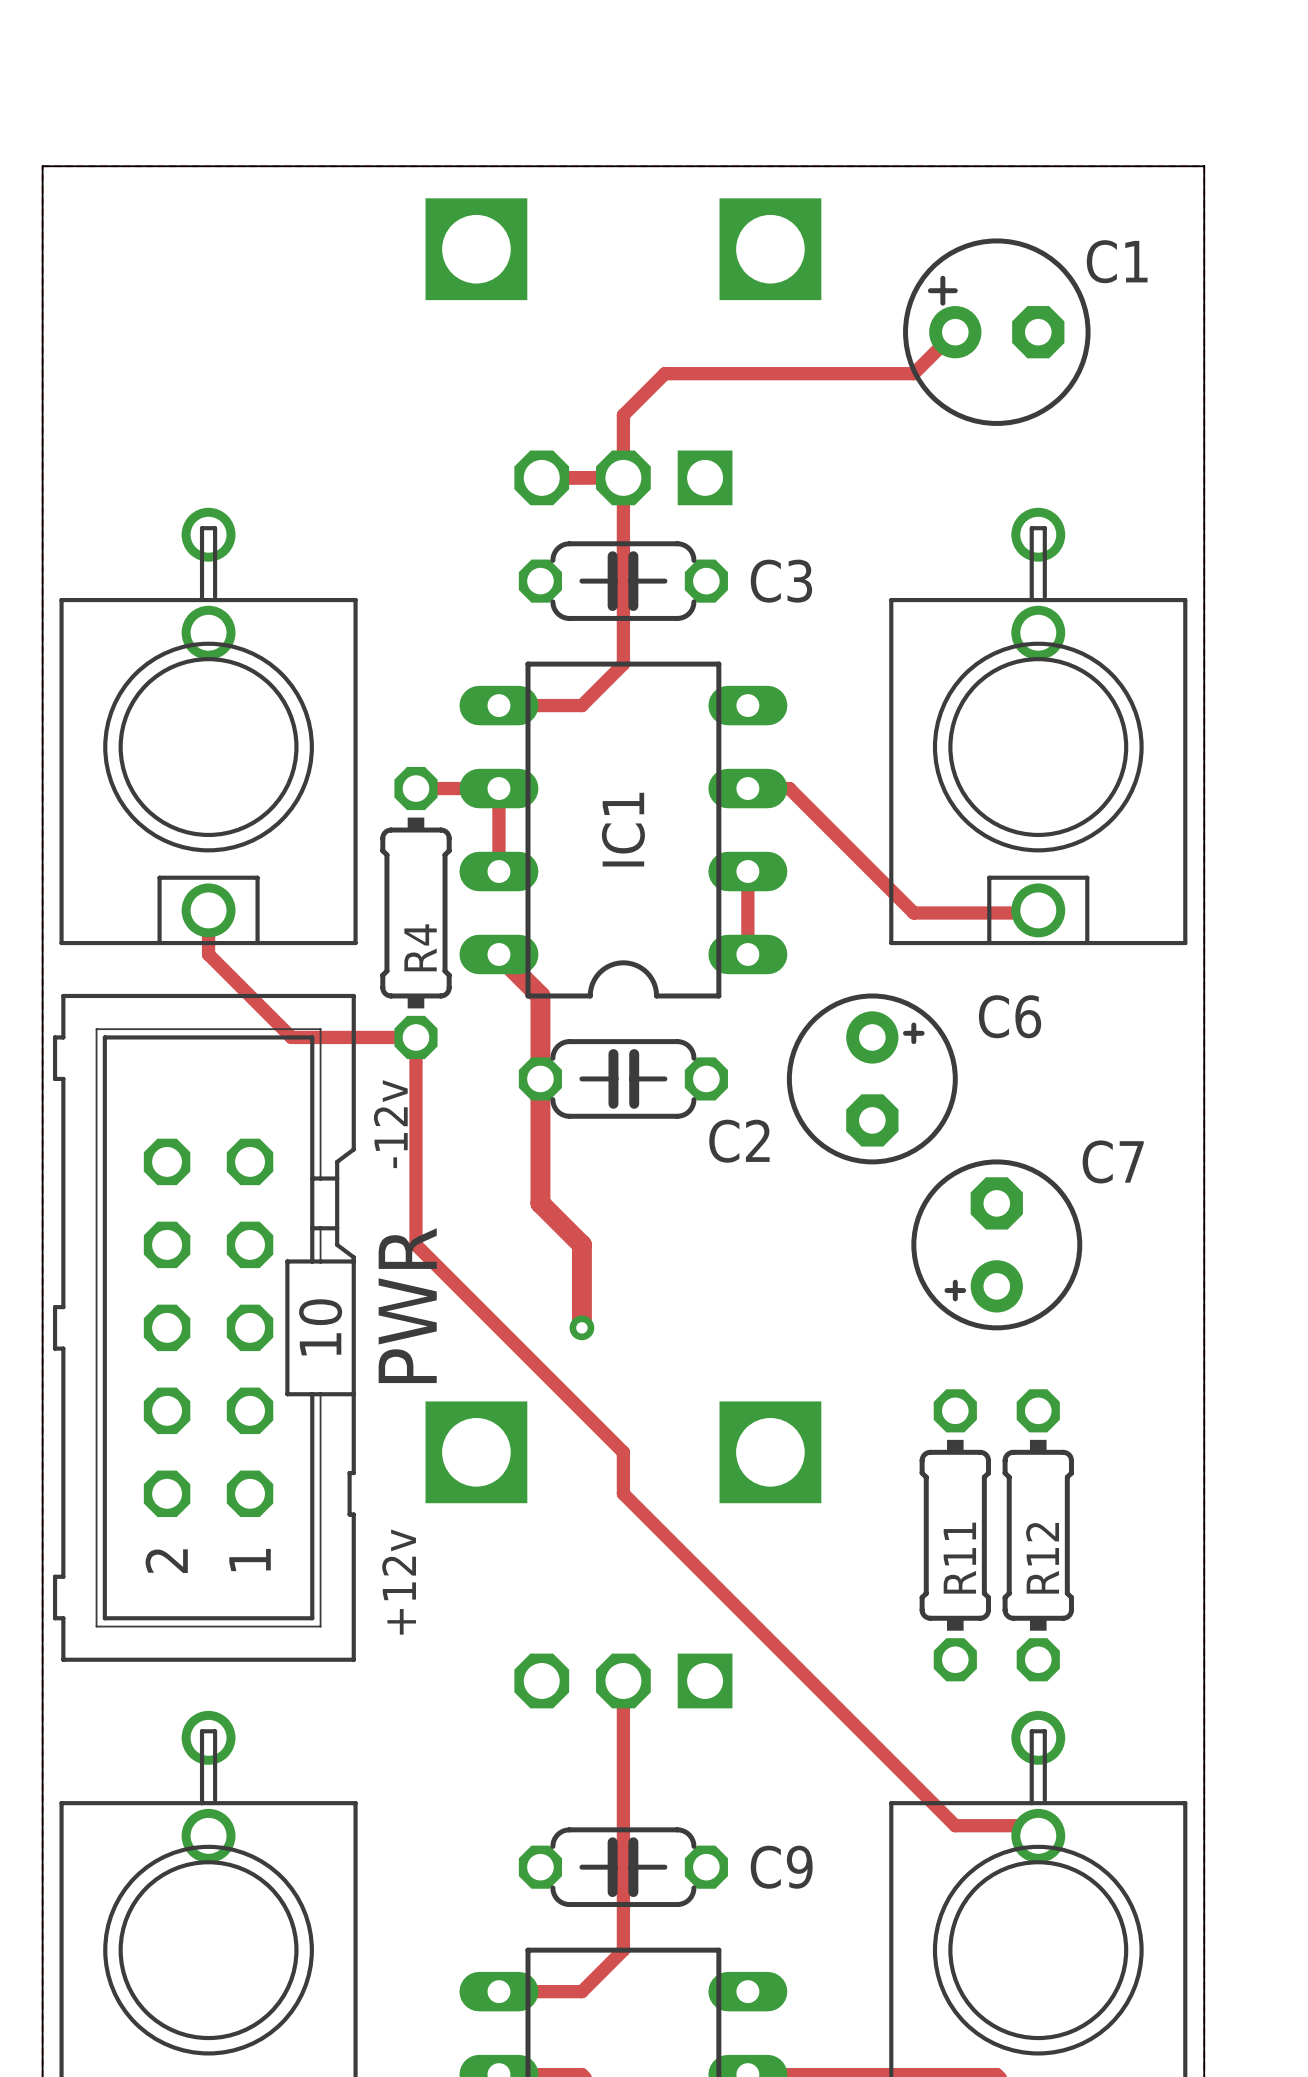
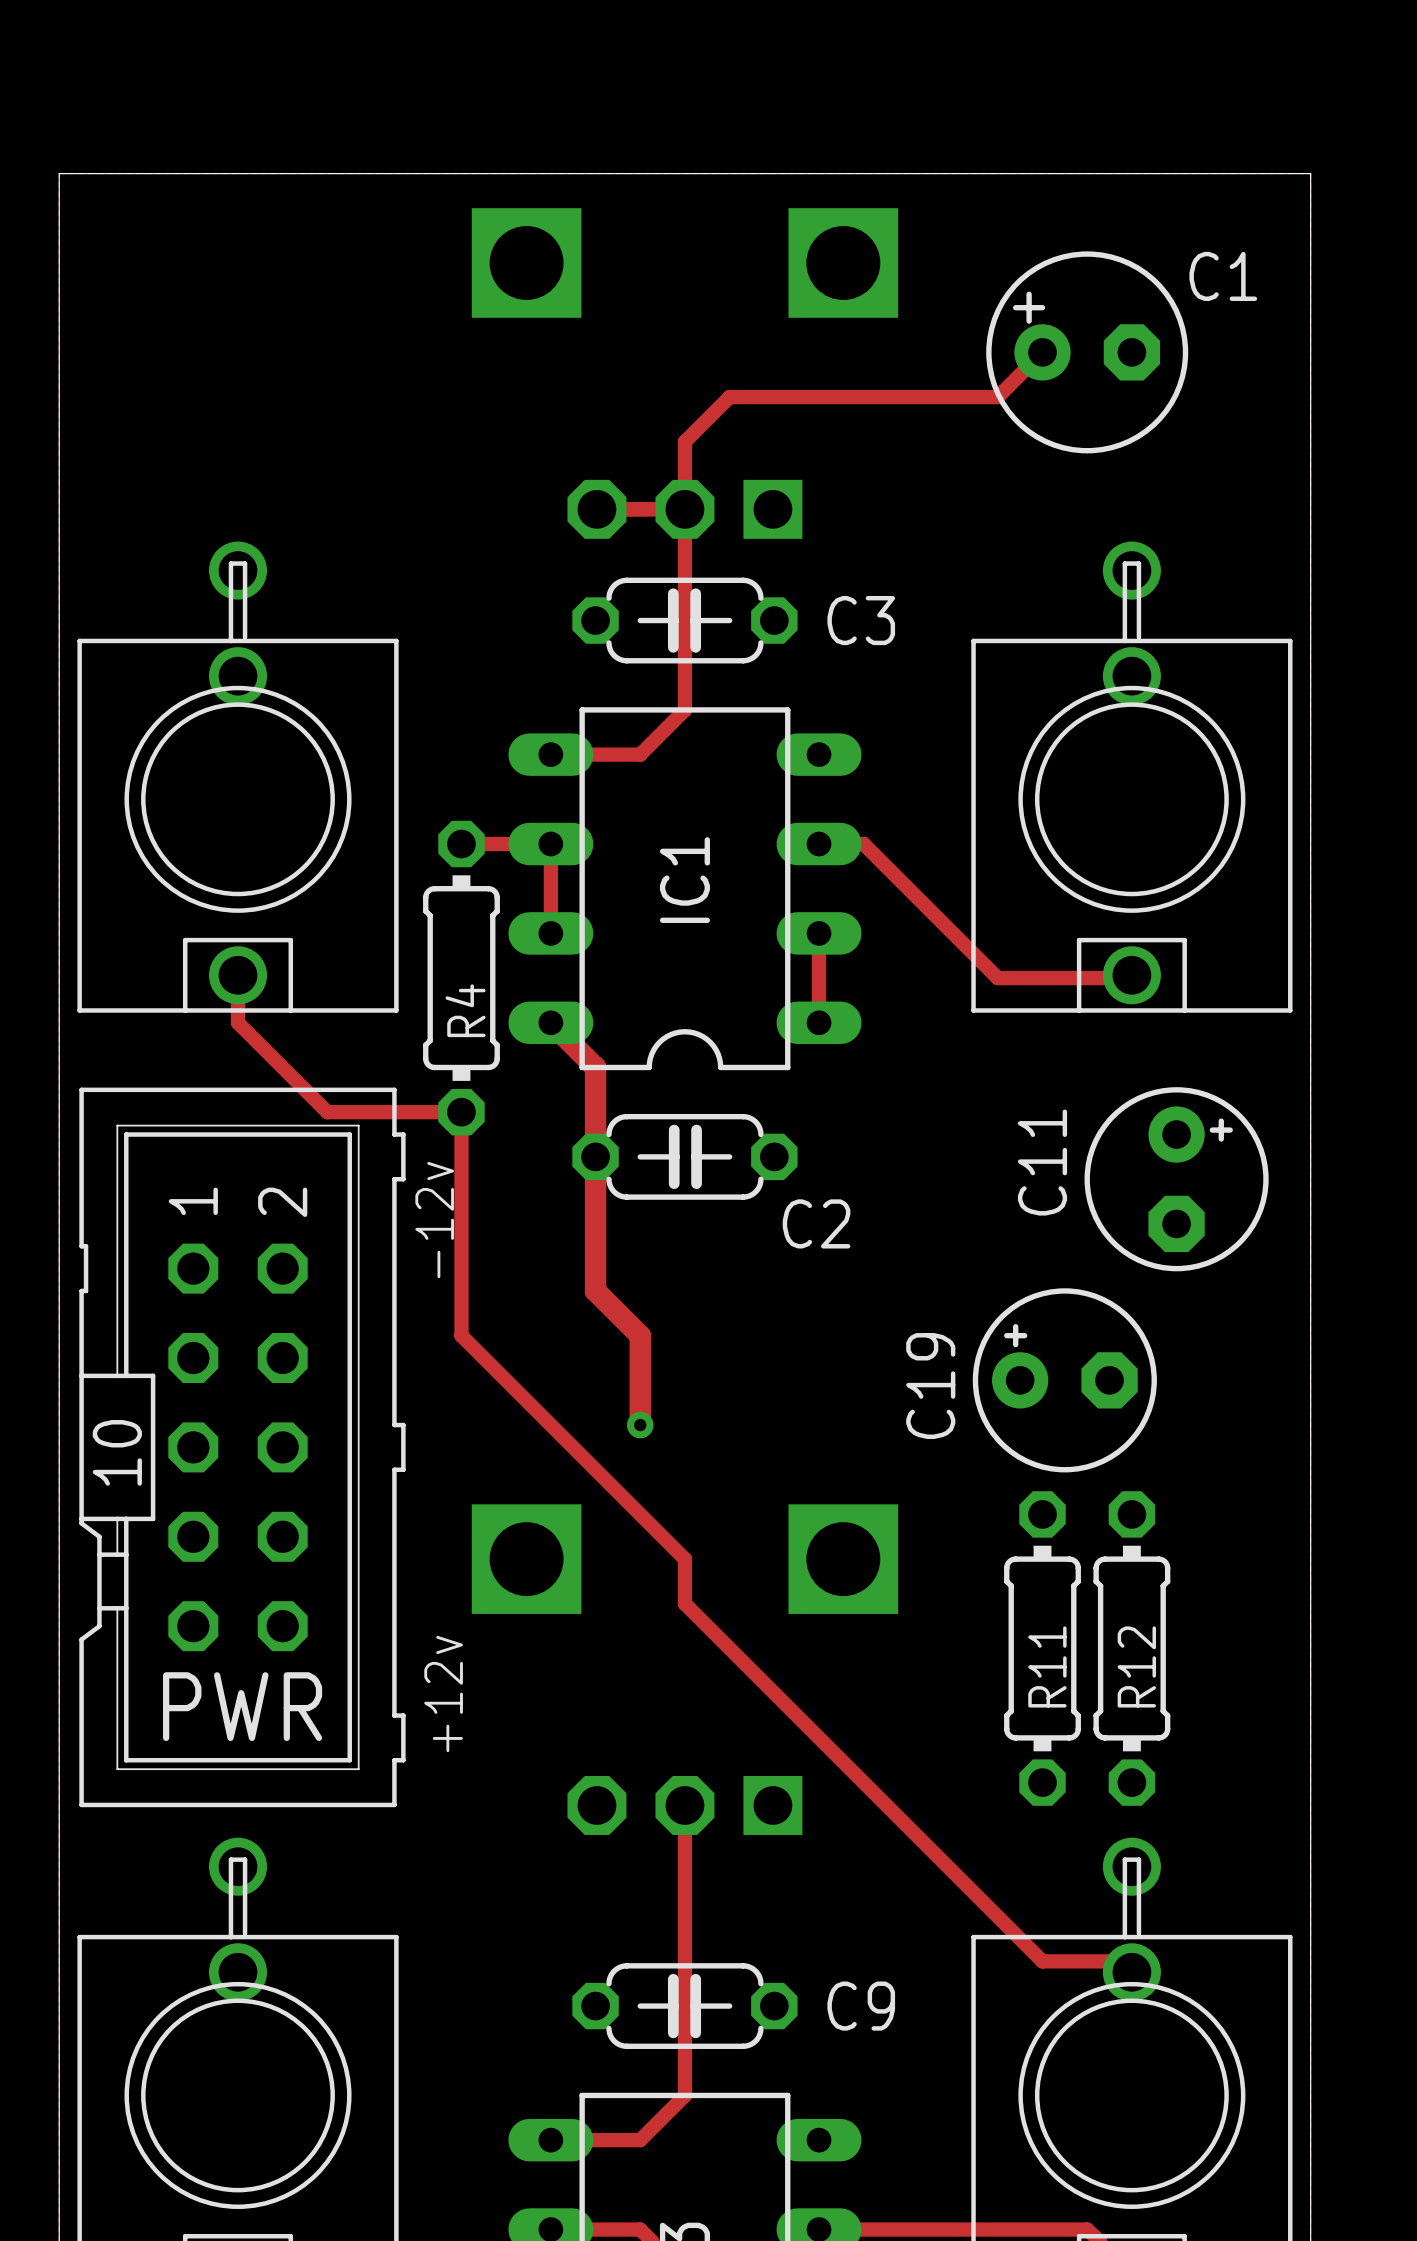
PWR footprint: [52, 993, 356, 1662] -> [79, 1087, 406, 1808]
C6: (872, 1078) -> none
C11: none -> (1176, 1179)
C7: (996, 1244) -> none
C19: none -> (1064, 1380)
PWR name position: PWR (407, 1305) -> PWR (242, 1706)

